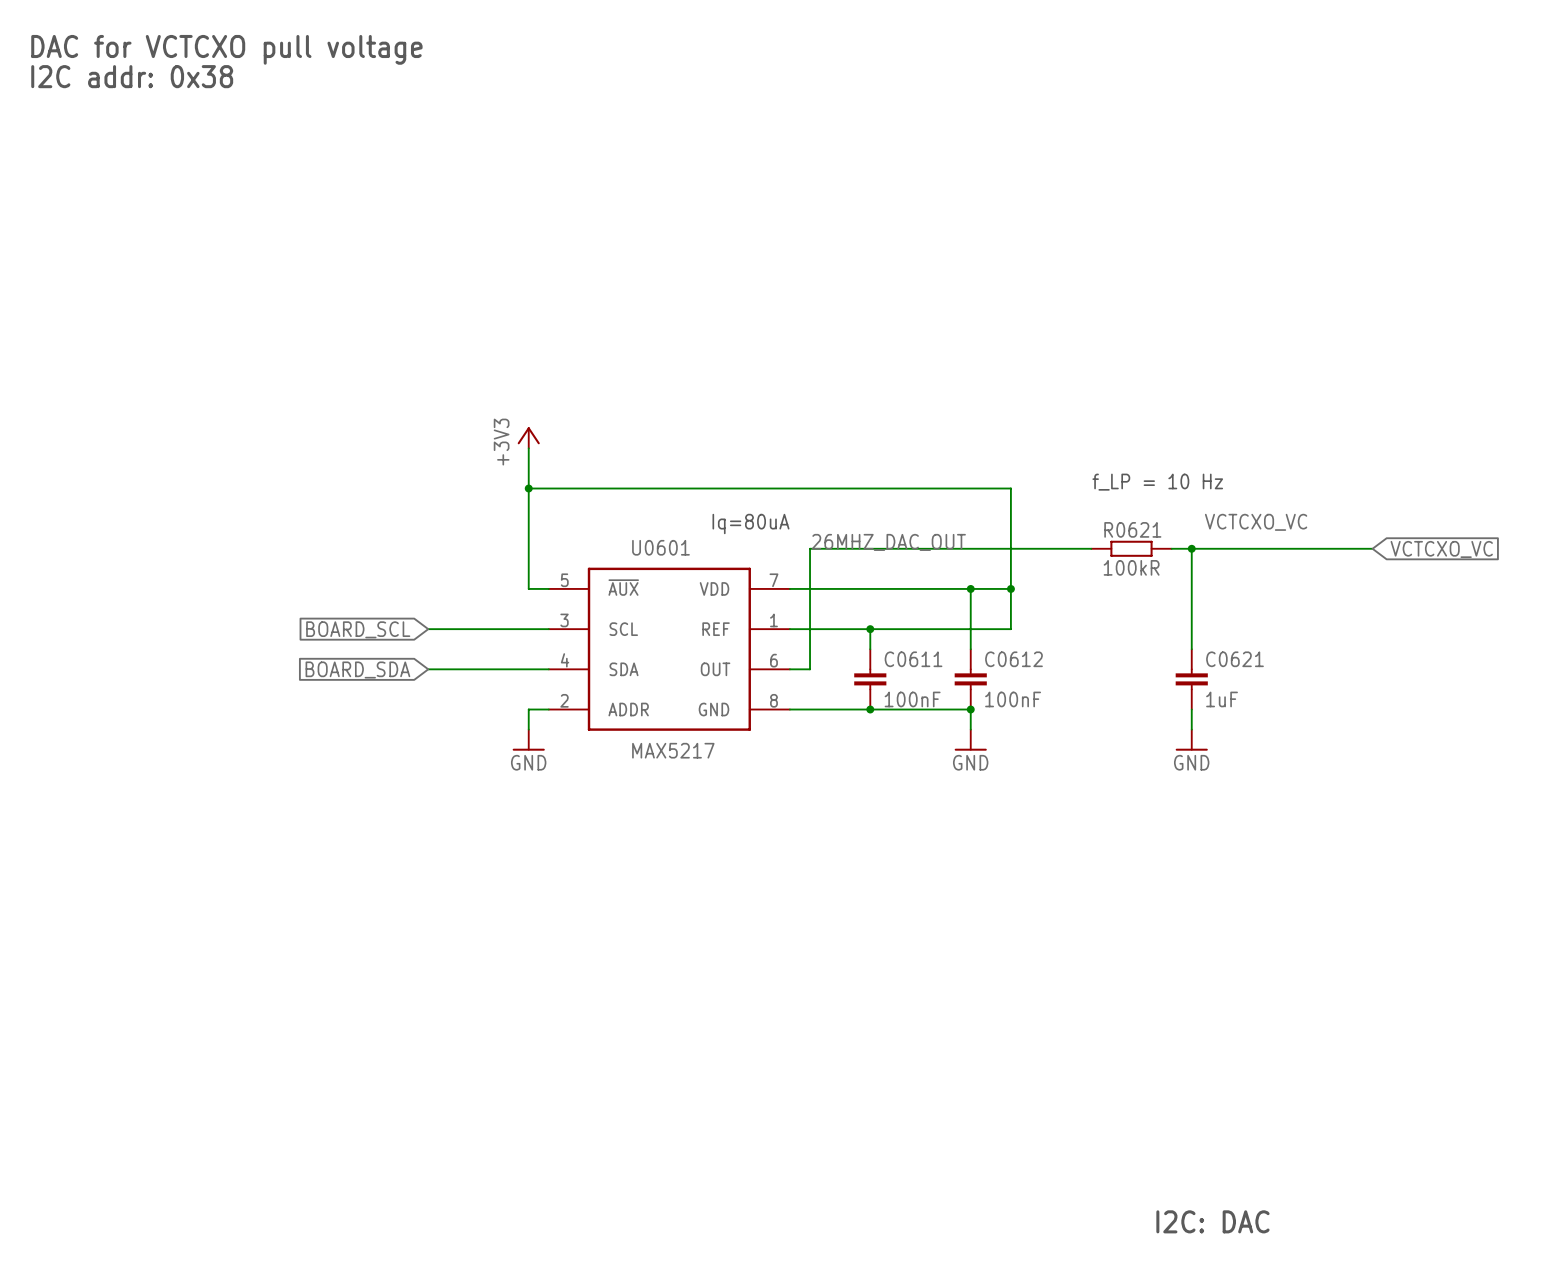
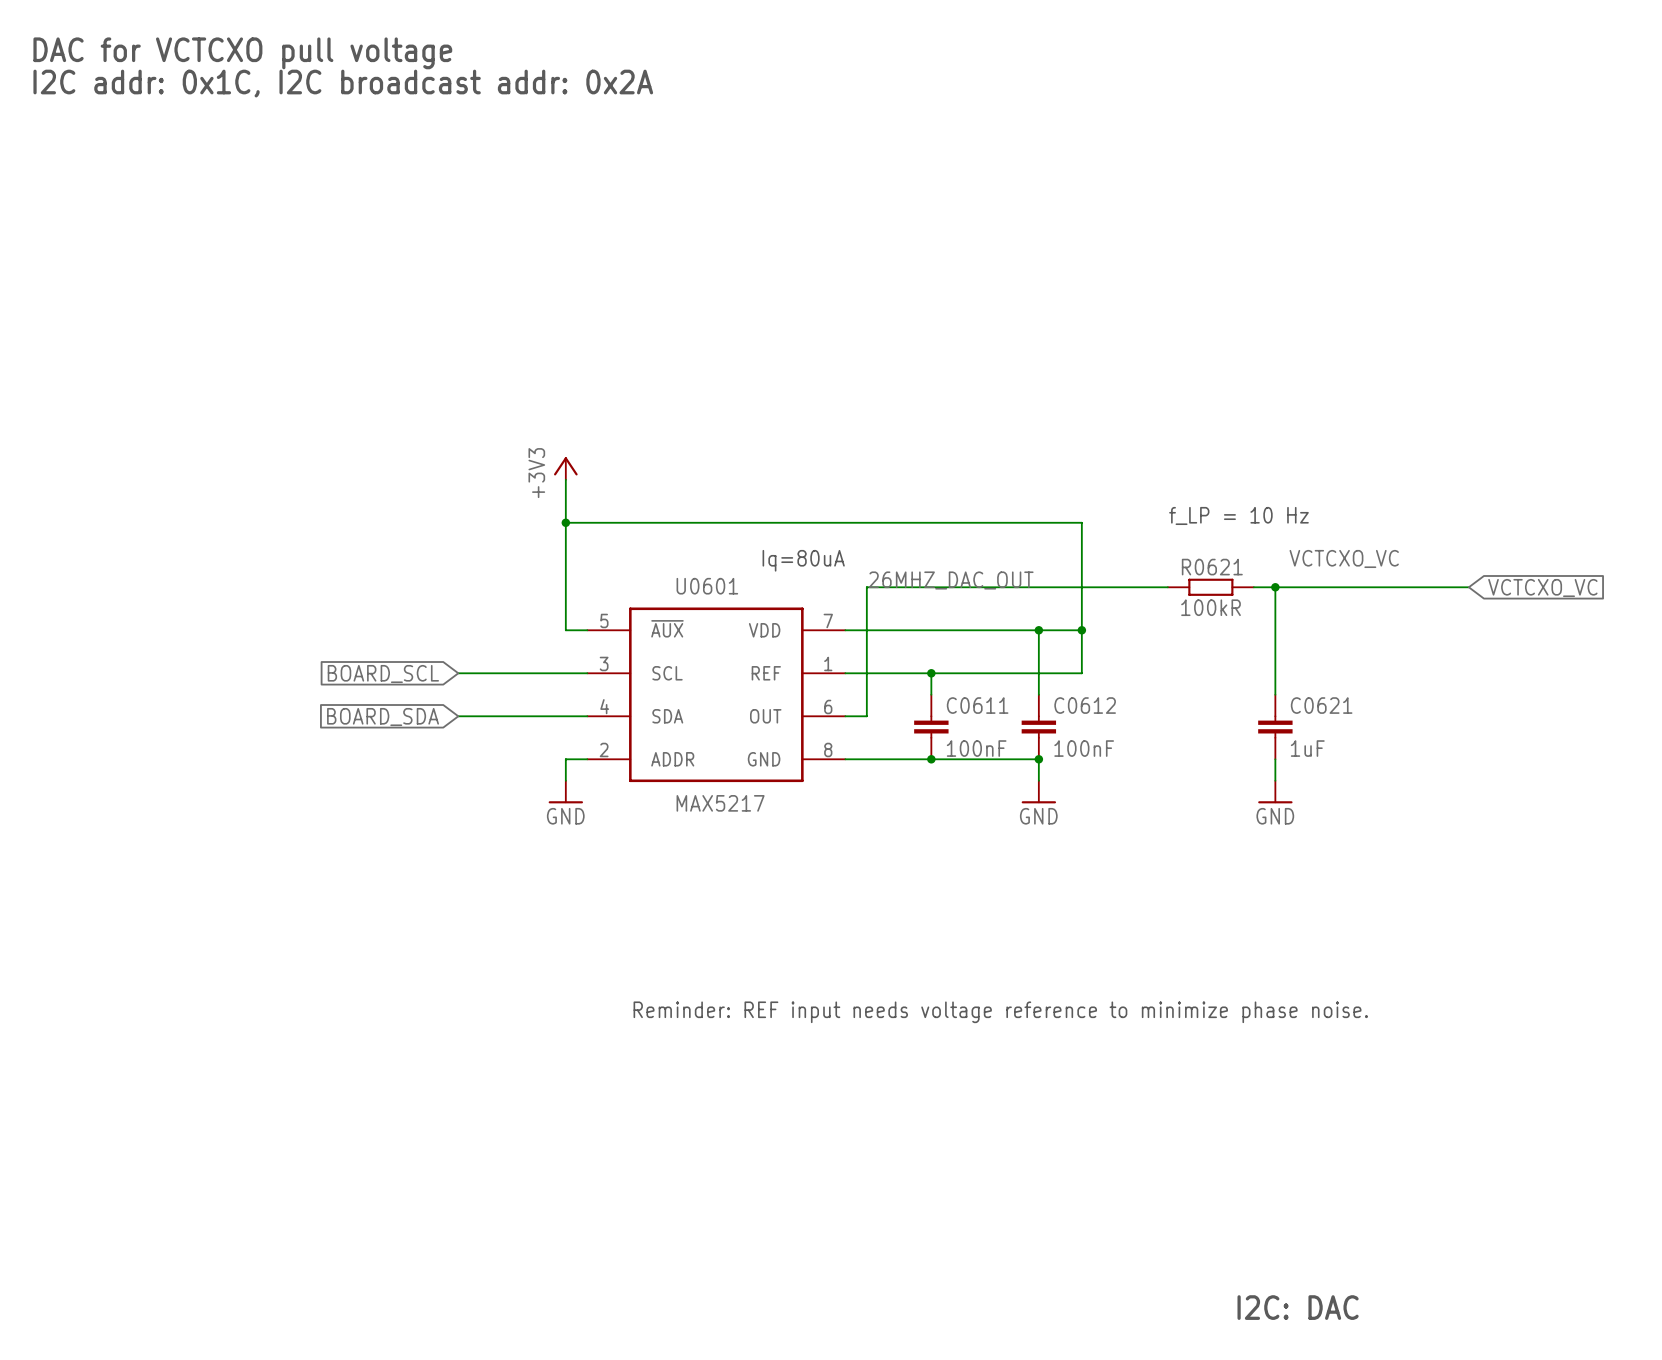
text: I2C addr: 0x38 (132, 76) -> I2C addr: 0x1C, I2C broadcast addr: 0x2A (343, 83)
text: none -> Reminder: REF input needs voltage reference to minimize phase noise. (1000, 1012)

